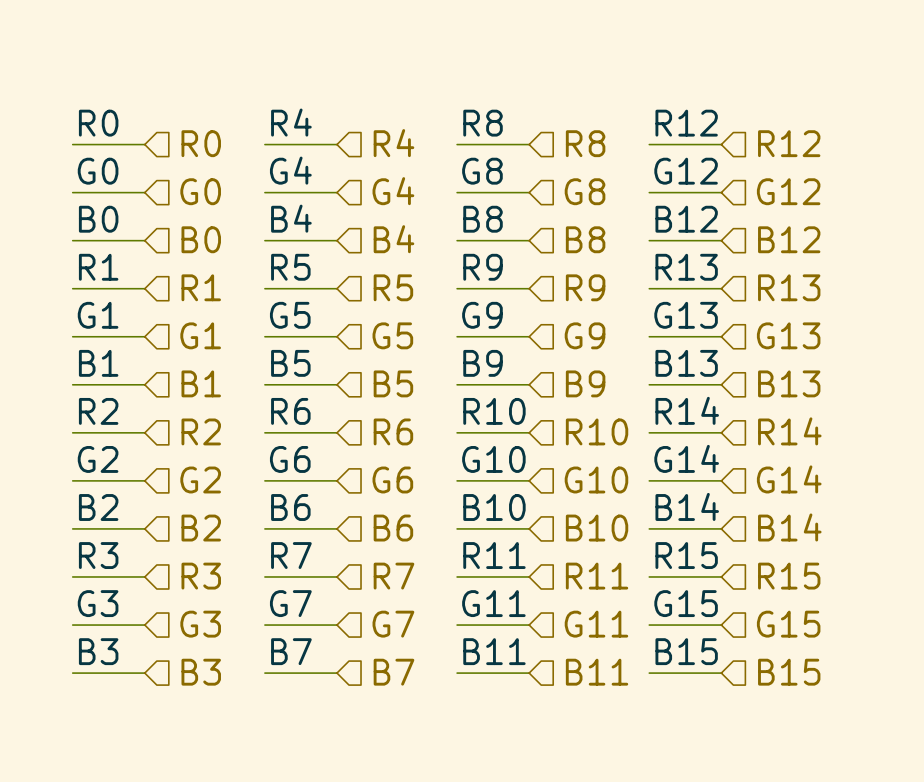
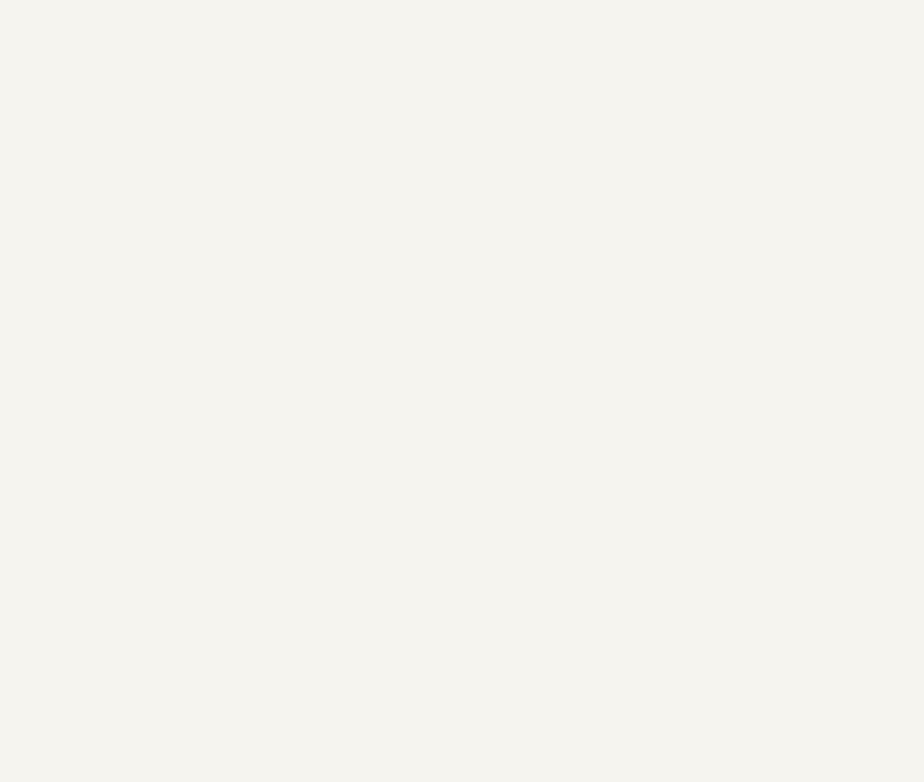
label: R4 (291, 122) -> none
label: R0 (98, 123) -> none
label: R8 (483, 123) -> none
label: R12 (686, 123) -> none
hierarchical label: R0 (201, 143) -> none
hierarchical label: R4 (393, 143) -> none
hierarchical label: R8 (585, 143) -> none
hierarchical label: R12 (789, 143) -> none
wire: (72, 144) (144, 144) -> none
wire: (264, 144) (336, 144) -> none
wire: (457, 144) (529, 144) -> none
wire: (649, 144) (721, 144) -> none
label: G4 (290, 170) -> none
label: G0 (98, 171) -> none
label: G8 (482, 171) -> none
label: G12 (686, 171) -> none
hierarchical label: G0 (200, 191) -> none
hierarchical label: G4 (393, 191) -> none
hierarchical label: G8 (585, 191) -> none
hierarchical label: G12 (788, 191) -> none
wire: (72, 192) (144, 192) -> none
wire: (264, 192) (336, 192) -> none
wire: (457, 192) (529, 192) -> none
wire: (649, 192) (721, 192) -> none
label: B4 (291, 218) -> none
label: B0 (98, 219) -> none
label: B8 (483, 219) -> none
label: B12 (686, 219) -> none
hierarchical label: B0 (201, 239) -> none
hierarchical label: B4 (393, 239) -> none
hierarchical label: B8 (585, 239) -> none
hierarchical label: B12 (789, 239) -> none
wire: (72, 240) (144, 240) -> none
wire: (264, 240) (336, 240) -> none
wire: (457, 240) (529, 240) -> none
wire: (649, 240) (721, 240) -> none
label: R1 (98, 267) -> none
label: R5 (290, 267) -> none
label: R9 (483, 267) -> none
label: R13 (686, 267) -> none
hierarchical label: R1 (201, 287) -> none
hierarchical label: R5 (393, 287) -> none
hierarchical label: R9 (585, 287) -> none
hierarchical label: R13 (789, 287) -> none
wire: (72, 288) (144, 288) -> none
wire: (264, 288) (336, 288) -> none
wire: (457, 288) (529, 288) -> none
wire: (649, 288) (721, 288) -> none
label: G1 (98, 315) -> none
label: G5 (290, 315) -> none
label: G9 (482, 315) -> none
label: G13 (686, 315) -> none
hierarchical label: G1 (200, 335) -> none
hierarchical label: G5 (392, 335) -> none
hierarchical label: G9 (585, 335) -> none
hierarchical label: G13 (788, 335) -> none
wire: (72, 336) (144, 336) -> none
wire: (264, 336) (336, 336) -> none
wire: (457, 336) (529, 336) -> none
wire: (649, 336) (721, 336) -> none
label: B1 (98, 363) -> none
label: B5 (290, 363) -> none
label: B9 (483, 363) -> none
label: B13 (686, 363) -> none
hierarchical label: B1 (201, 383) -> none
hierarchical label: B5 (393, 383) -> none
hierarchical label: B9 (585, 383) -> none
hierarchical label: B13 (789, 383) -> none
wire: (72, 384) (144, 384) -> none
wire: (264, 384) (336, 384) -> none
wire: (457, 384) (529, 384) -> none
wire: (649, 384) (721, 384) -> none
label: R14 (687, 410) -> none
label: R2 (98, 411) -> none
label: R6 (290, 411) -> none
label: R10 (494, 411) -> none
hierarchical label: R2 (201, 431) -> none
hierarchical label: R6 (393, 431) -> none
hierarchical label: R10 (597, 431) -> none
hierarchical label: R14 (789, 431) -> none
wire: (72, 432) (144, 432) -> none
wire: (264, 432) (336, 432) -> none
wire: (457, 432) (529, 432) -> none
wire: (649, 432) (721, 432) -> none
label: G14 (686, 458) -> none
label: G2 (98, 459) -> none
label: G6 (290, 459) -> none
label: G10 (493, 459) -> none
hierarchical label: G2 (200, 479) -> none
hierarchical label: G6 (392, 479) -> none
hierarchical label: G10 (596, 479) -> none
hierarchical label: G14 (789, 479) -> none
wire: (72, 480) (144, 480) -> none
wire: (264, 480) (336, 480) -> none
wire: (457, 480) (529, 480) -> none
wire: (649, 480) (721, 480) -> none
label: B14 (687, 506) -> none
label: B2 (98, 507) -> none
label: B6 (290, 507) -> none
label: B10 (494, 507) -> none
hierarchical label: B14 (789, 527) -> none
wire: (72, 528) (144, 528) -> none
hierarchical label: B2 (201, 528) -> none
wire: (264, 528) (336, 528) -> none
hierarchical label: B6 (393, 528) -> none
wire: (457, 528) (529, 528) -> none
hierarchical label: B10 (597, 528) -> none
wire: (649, 528) (721, 528) -> none
label: R3 (98, 555) -> none
label: R7 (291, 555) -> none
label: R11 (494, 555) -> none
label: R15 (686, 555) -> none
wire: (72, 576) (144, 576) -> none
hierarchical label: R3 (201, 576) -> none
wire: (264, 576) (336, 576) -> none
hierarchical label: R7 (393, 576) -> none
wire: (457, 576) (529, 576) -> none
hierarchical label: R11 (597, 576) -> none
wire: (649, 576) (721, 576) -> none
hierarchical label: R15 (789, 576) -> none
label: G3 (98, 603) -> none
label: G7 (290, 603) -> none
label: G11 (493, 603) -> none
label: G15 (686, 603) -> none
hierarchical label: G3 (200, 624) -> none
hierarchical label: G7 (393, 624) -> none
hierarchical label: G11 (596, 624) -> none
hierarchical label: G15 (788, 624) -> none
wire: (72, 625) (144, 625) -> none
wire: (264, 625) (336, 625) -> none
wire: (457, 625) (529, 625) -> none
wire: (649, 625) (721, 625) -> none
label: B3 (98, 651) -> none
label: B7 (291, 651) -> none
label: B11 (494, 651) -> none
label: B15 (686, 651) -> none
hierarchical label: B3 (201, 672) -> none
hierarchical label: B7 (393, 672) -> none
hierarchical label: B11 (597, 672) -> none
hierarchical label: B15 (789, 672) -> none
wire: (72, 673) (144, 673) -> none
wire: (264, 673) (336, 673) -> none
wire: (457, 673) (529, 673) -> none
wire: (649, 673) (721, 673) -> none

